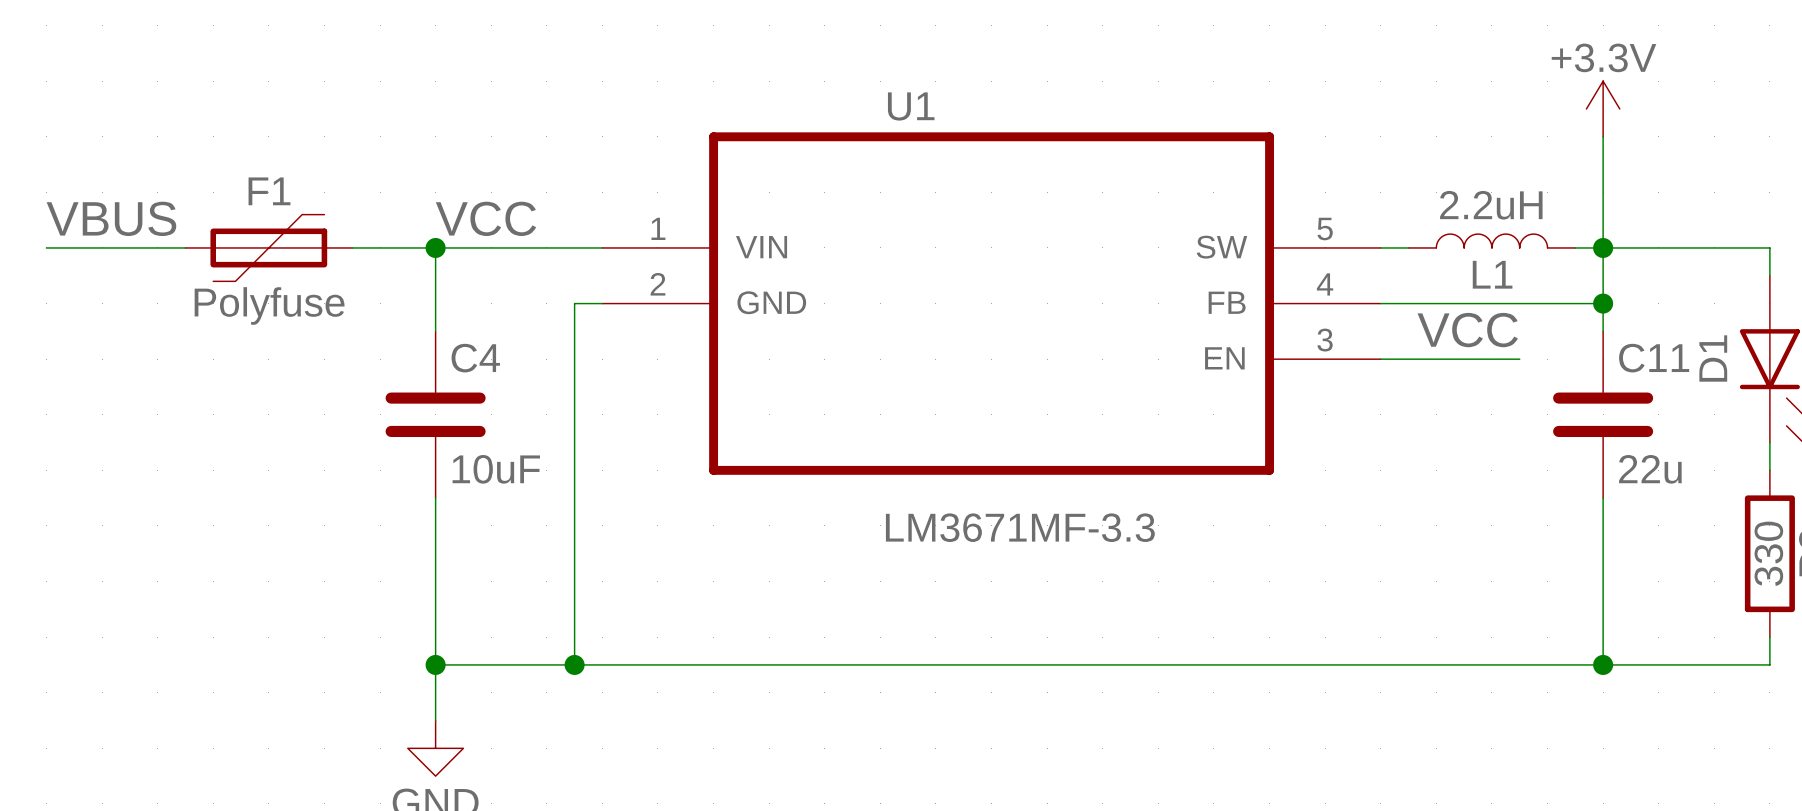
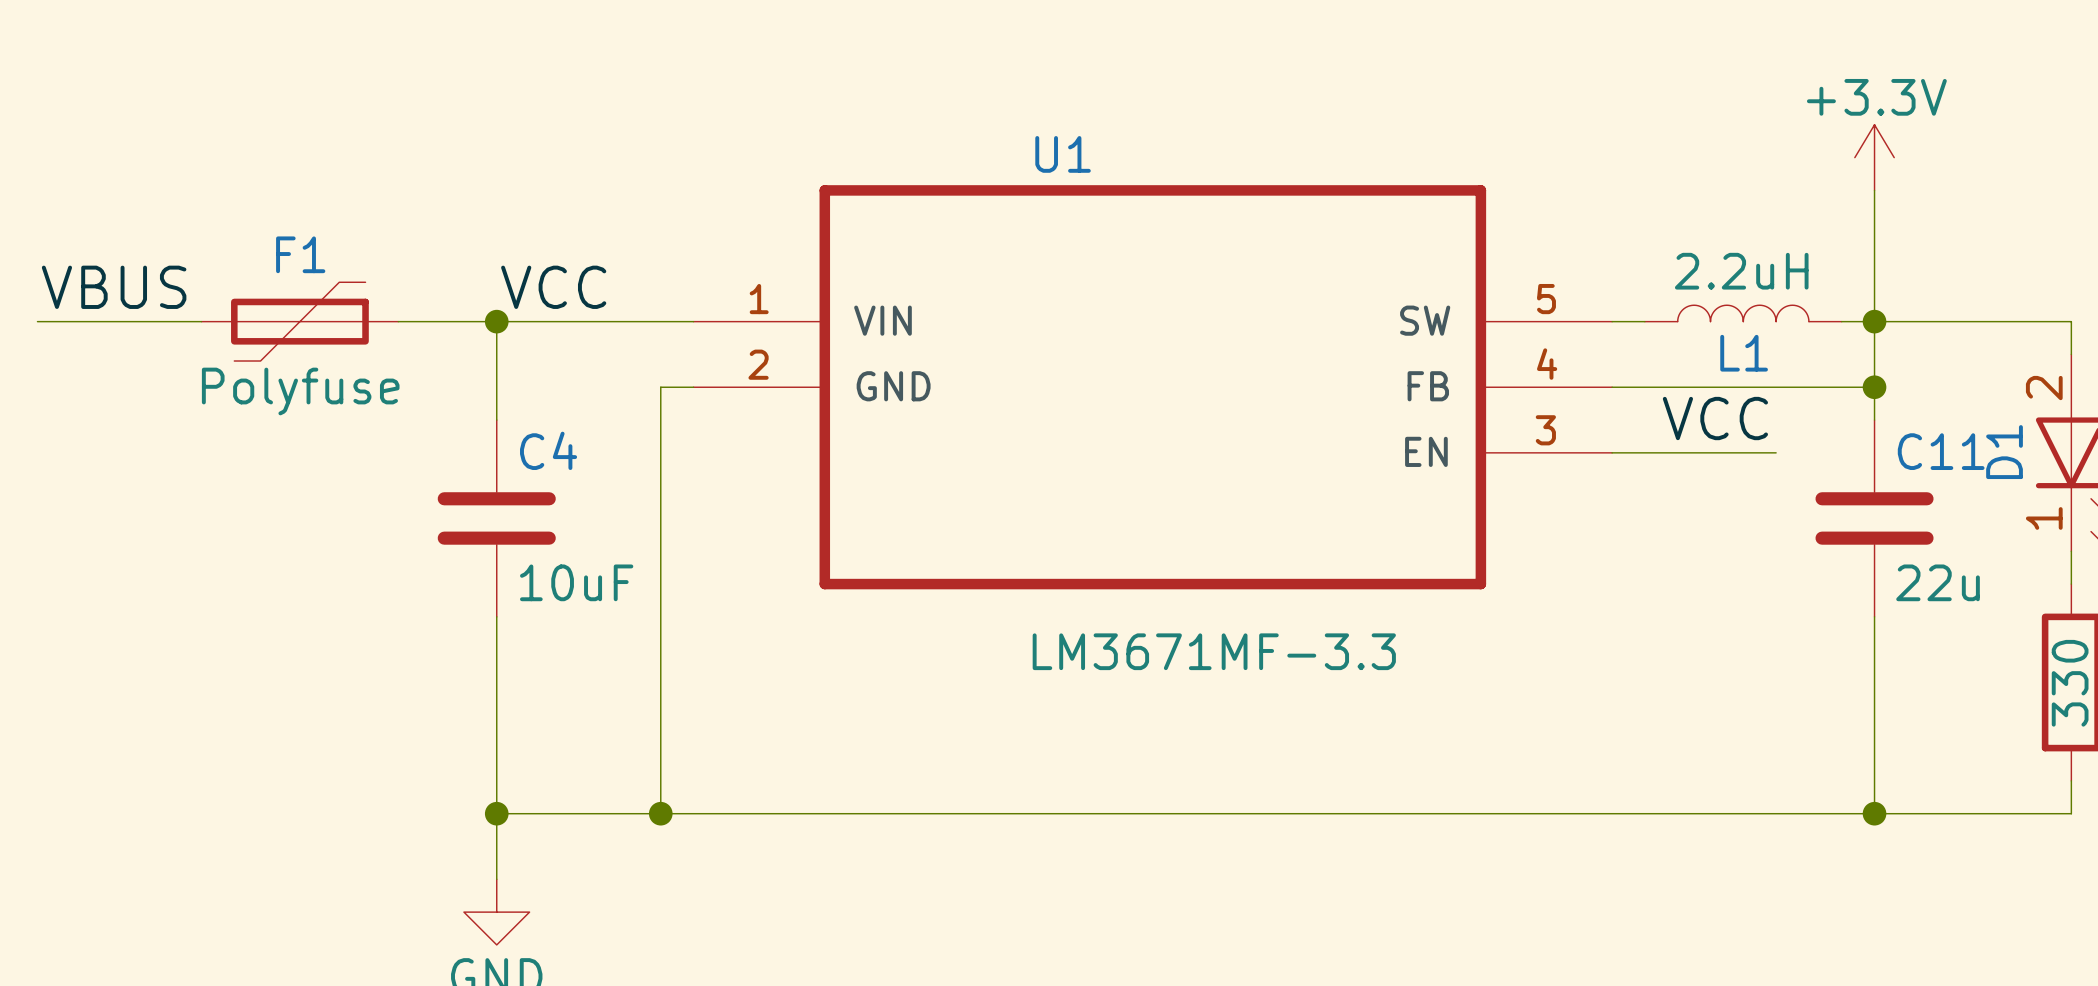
D1 pin number: none -> 2 (2044, 388)
D1 pin number: none -> 1 (2044, 518)

